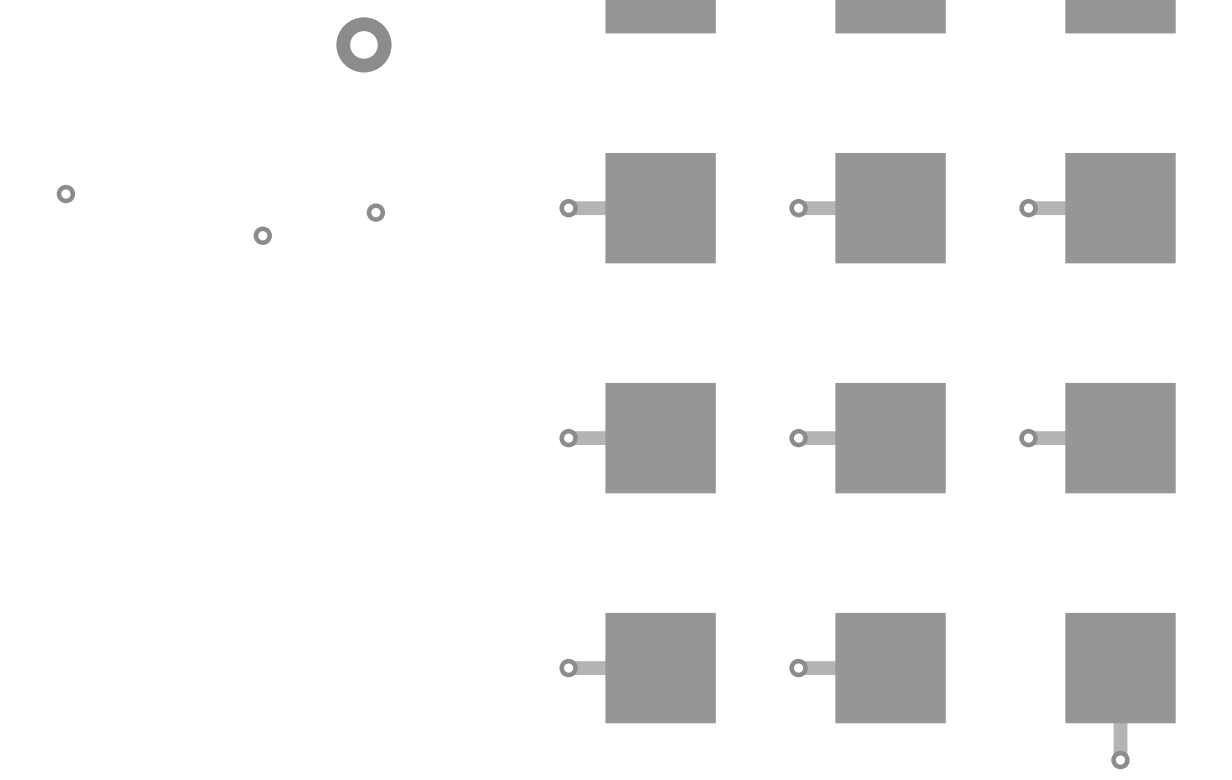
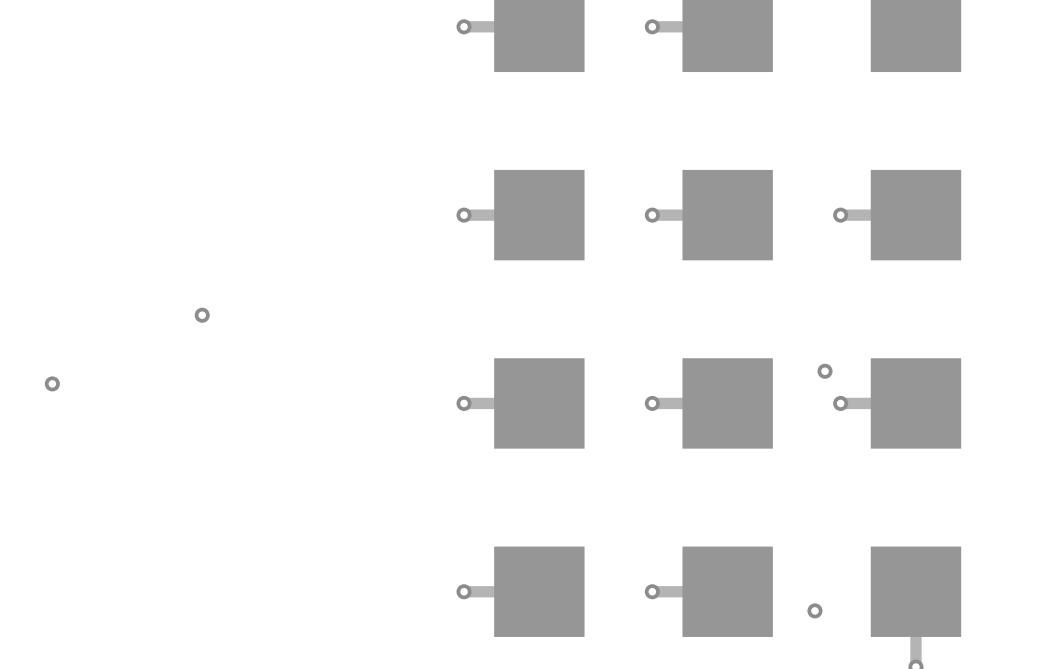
via: (363, 44) -> none
via: (65, 194) -> none
via: (375, 212) -> none
via: (262, 235) -> none
via: none -> (202, 315)
via: none -> (825, 371)
via: none -> (52, 383)
via: none -> (814, 610)

